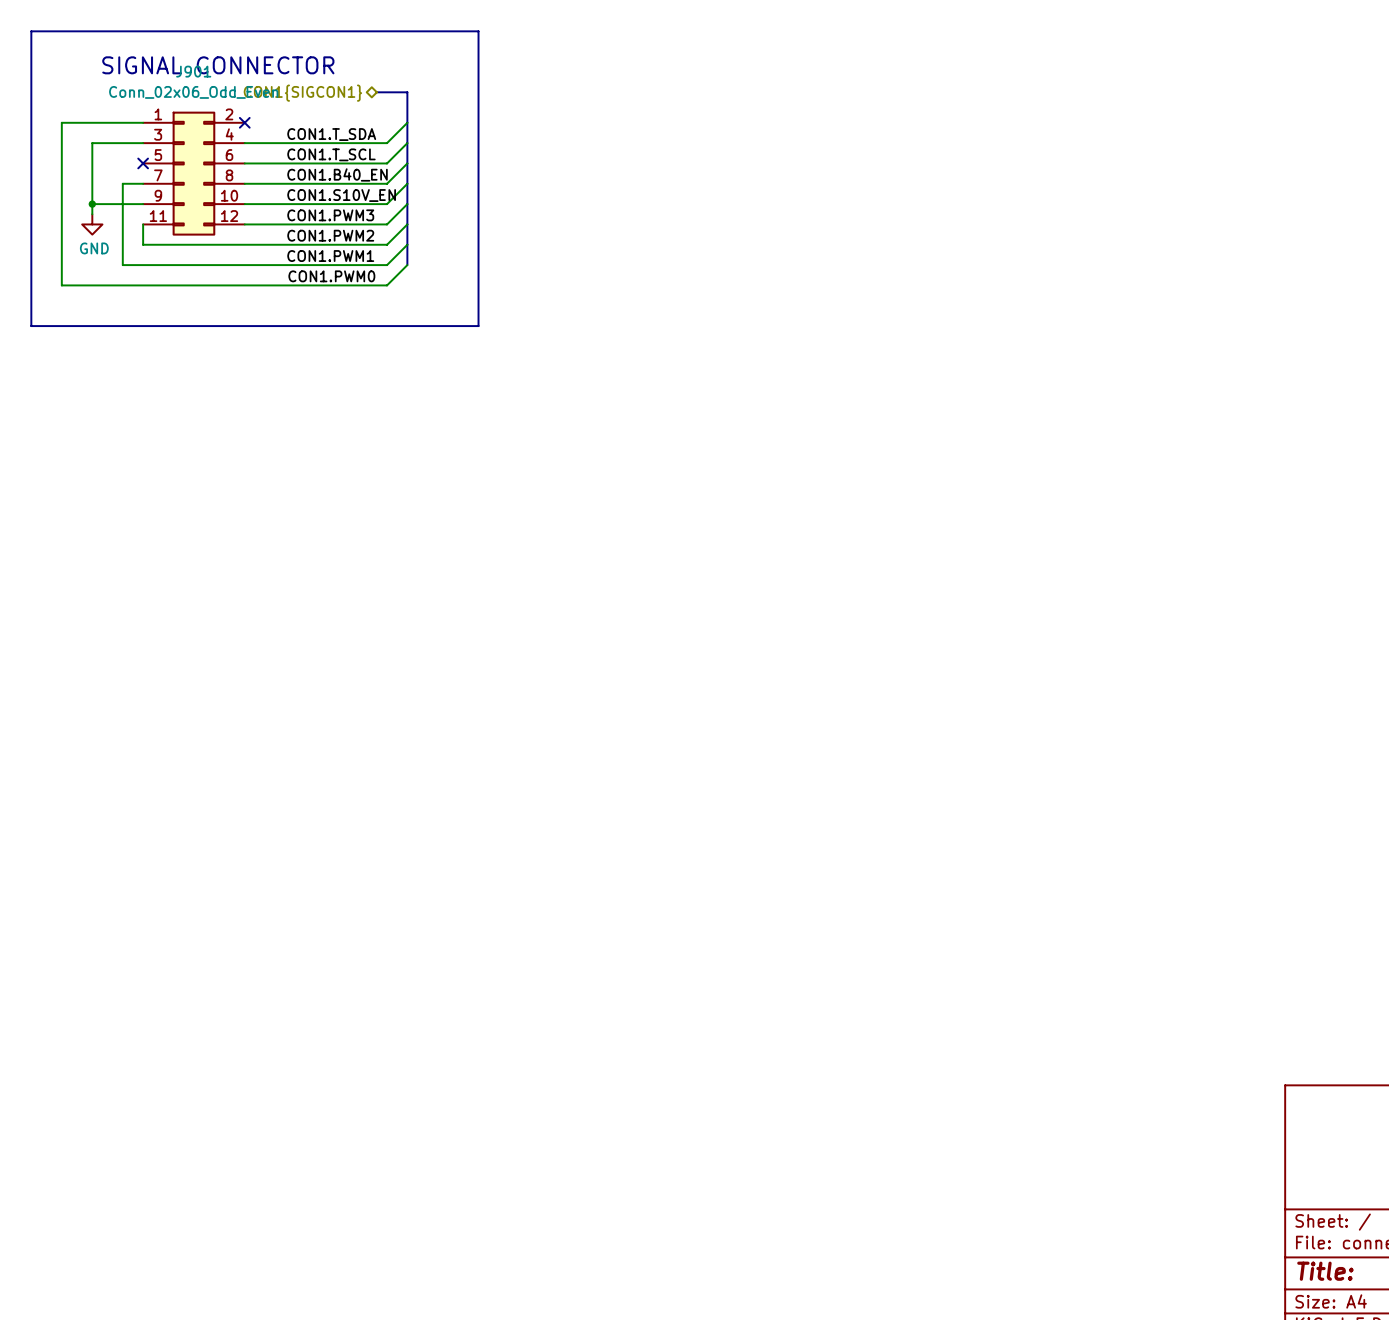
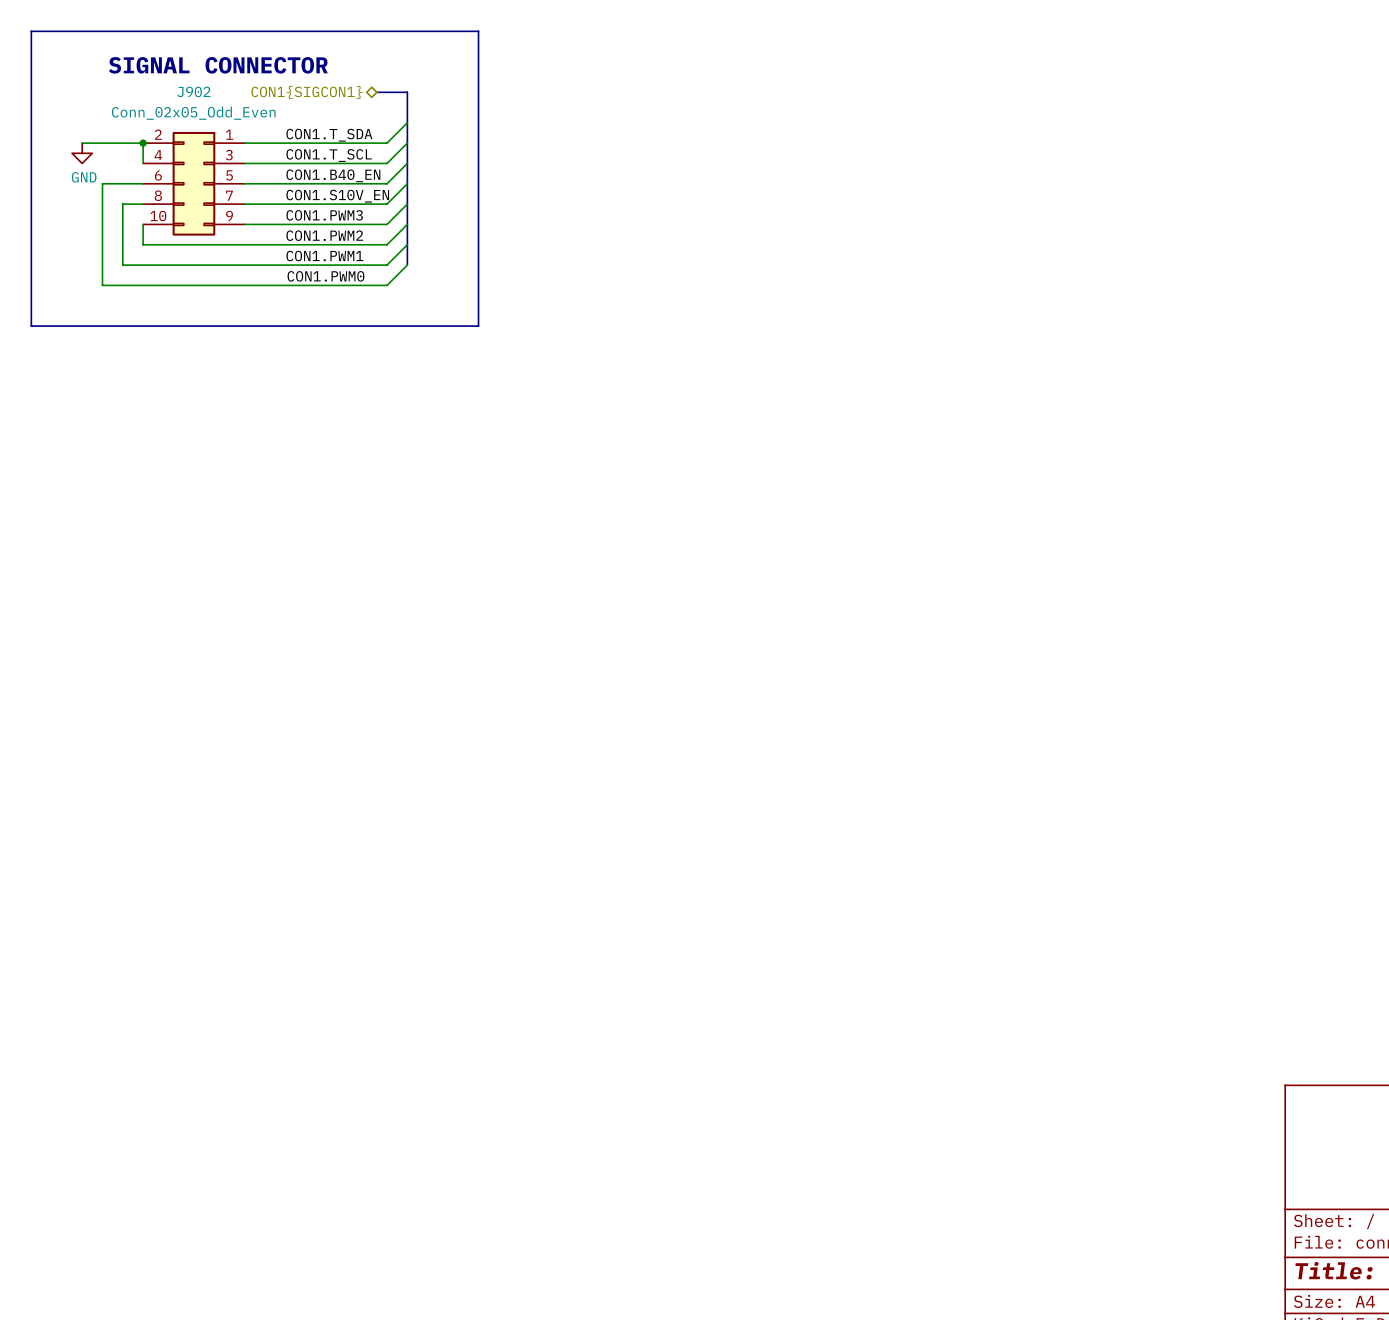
wire: (143, 122) (61, 122) (61, 285) (102, 285) -> (122, 183) (102, 183) (102, 285)
no-connect mark: (244, 122) -> none
wire: (92, 143) (92, 214) -> (92, 143) (82, 143)
wire: none -> (143, 143) (143, 163)
junction: none -> (143, 143)
no-connect mark: (143, 163) -> none
J901: Conn_02x06_Odd_Even (193, 173) -> none
wire: (122, 183) (122, 204) (92, 204) -> none
J902: none -> Conn_02x05_Odd_Even (193, 183)
junction: (92, 204) -> none
power symbol position: GND (92, 224) -> GND (82, 153)

